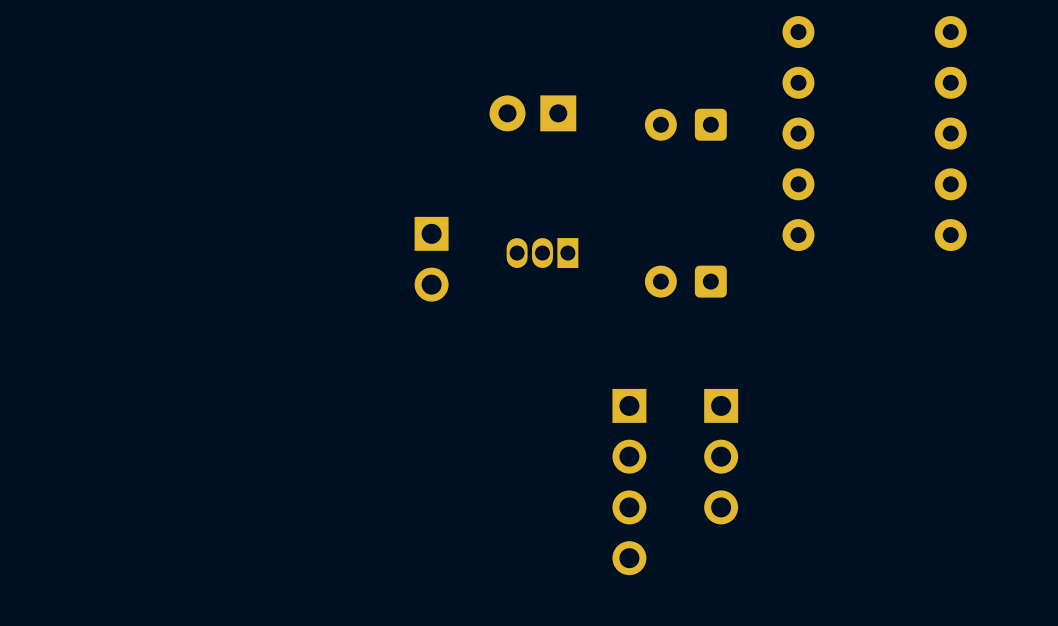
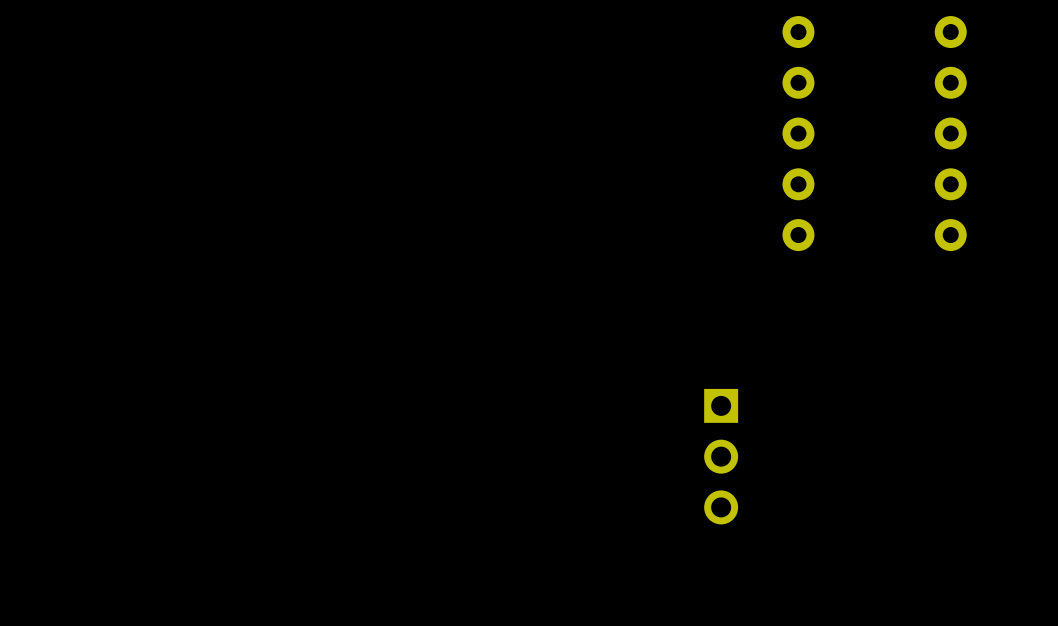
part: (532, 113) -> none
part: (685, 124) -> none
part: (542, 253) -> none
part: (431, 259) -> none
part: (685, 281) -> none
part: (629, 482) -> none

